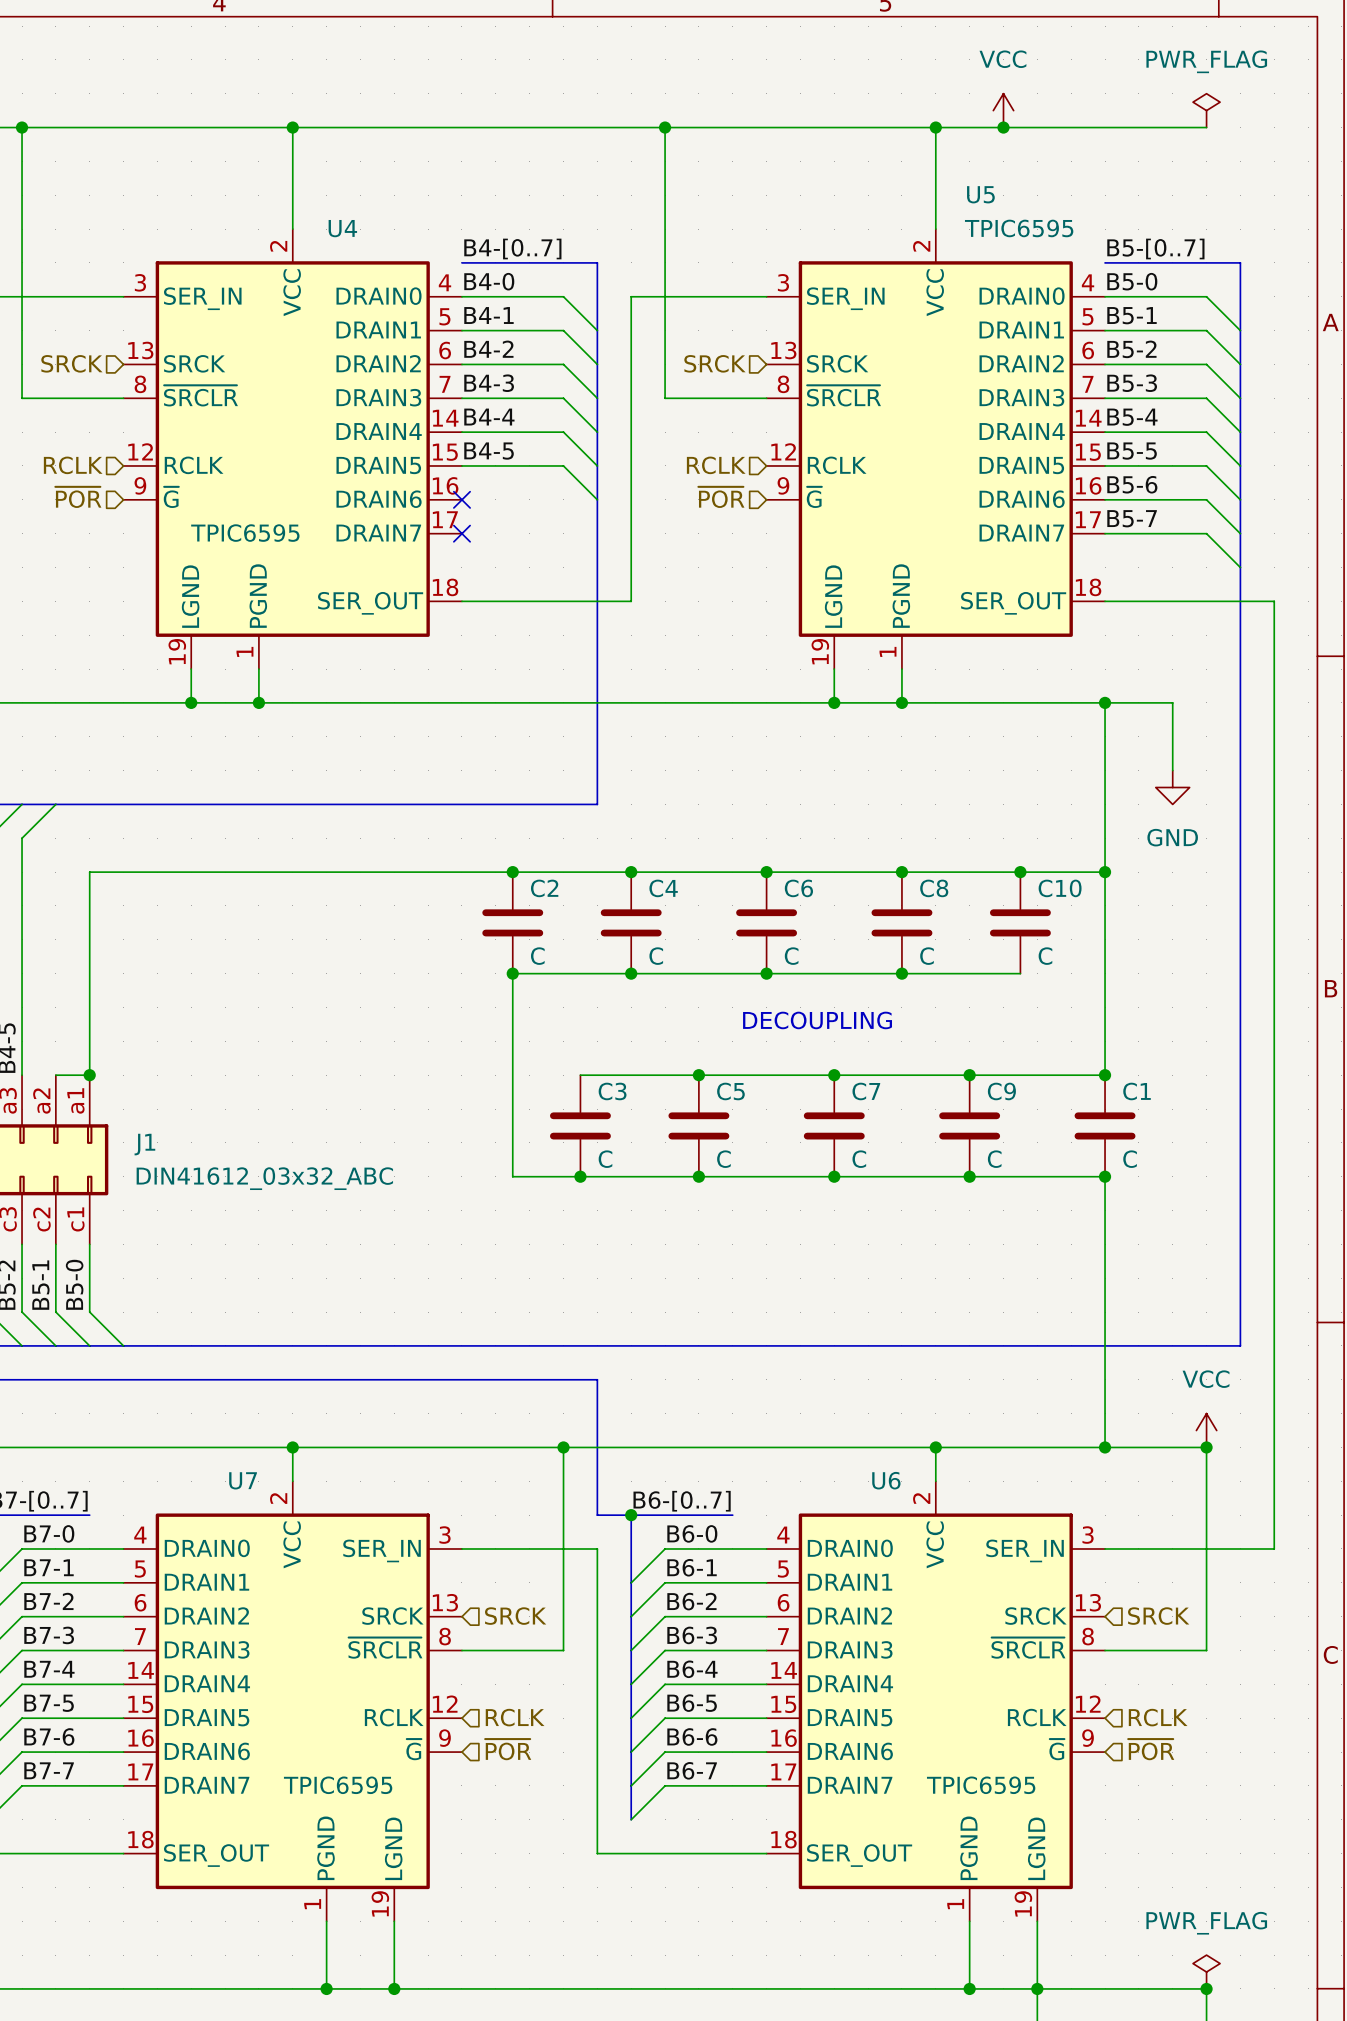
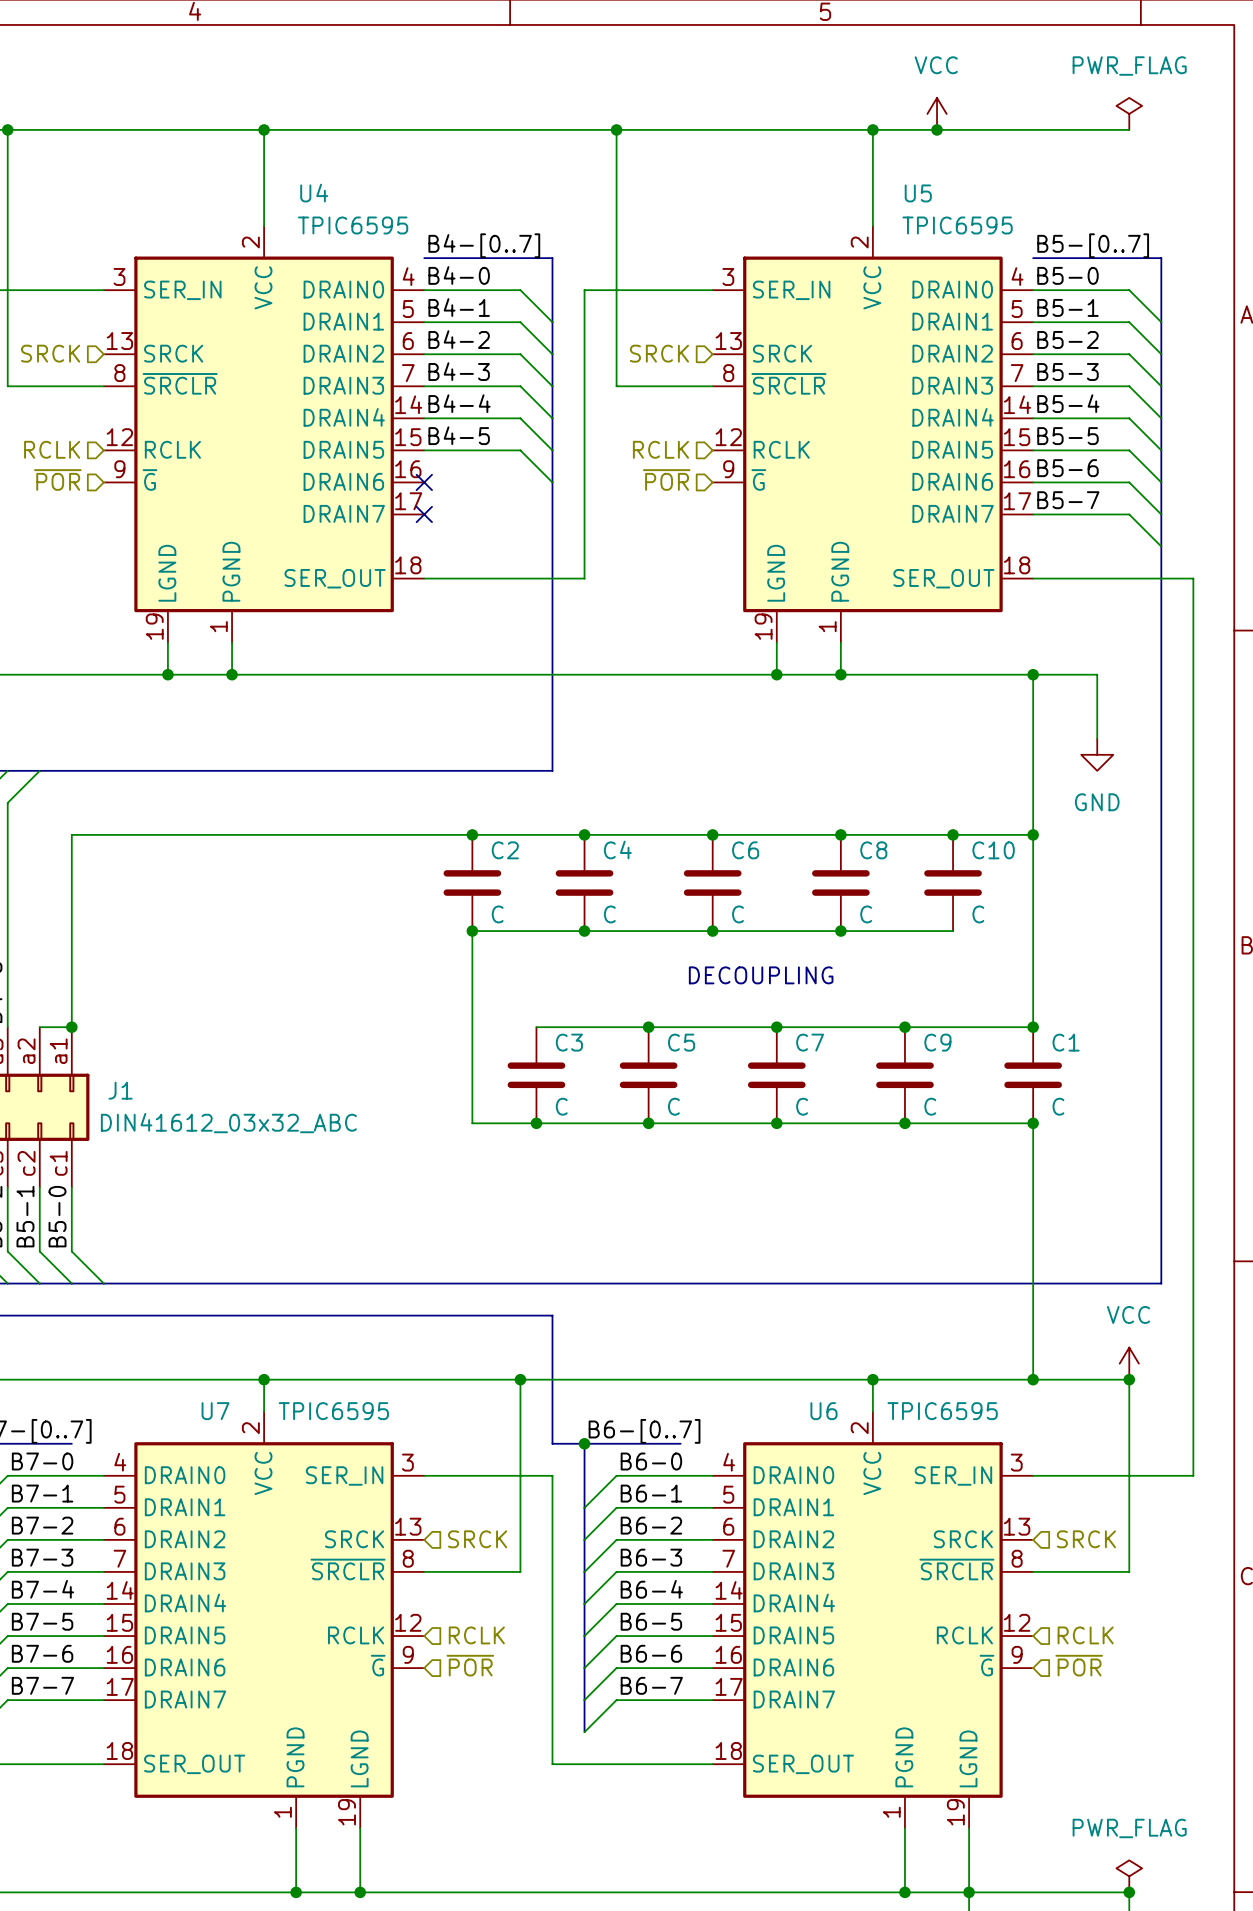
U4 name position: U4 (342, 228) -> U4 (314, 193)
U4 value position: TPIC6595 (245, 533) -> TPIC6595 (353, 225)
U7 value position: TPIC6595 (338, 1785) -> TPIC6595 (333, 1411)
U6 value position: TPIC6595 (981, 1785) -> TPIC6595 (942, 1411)

